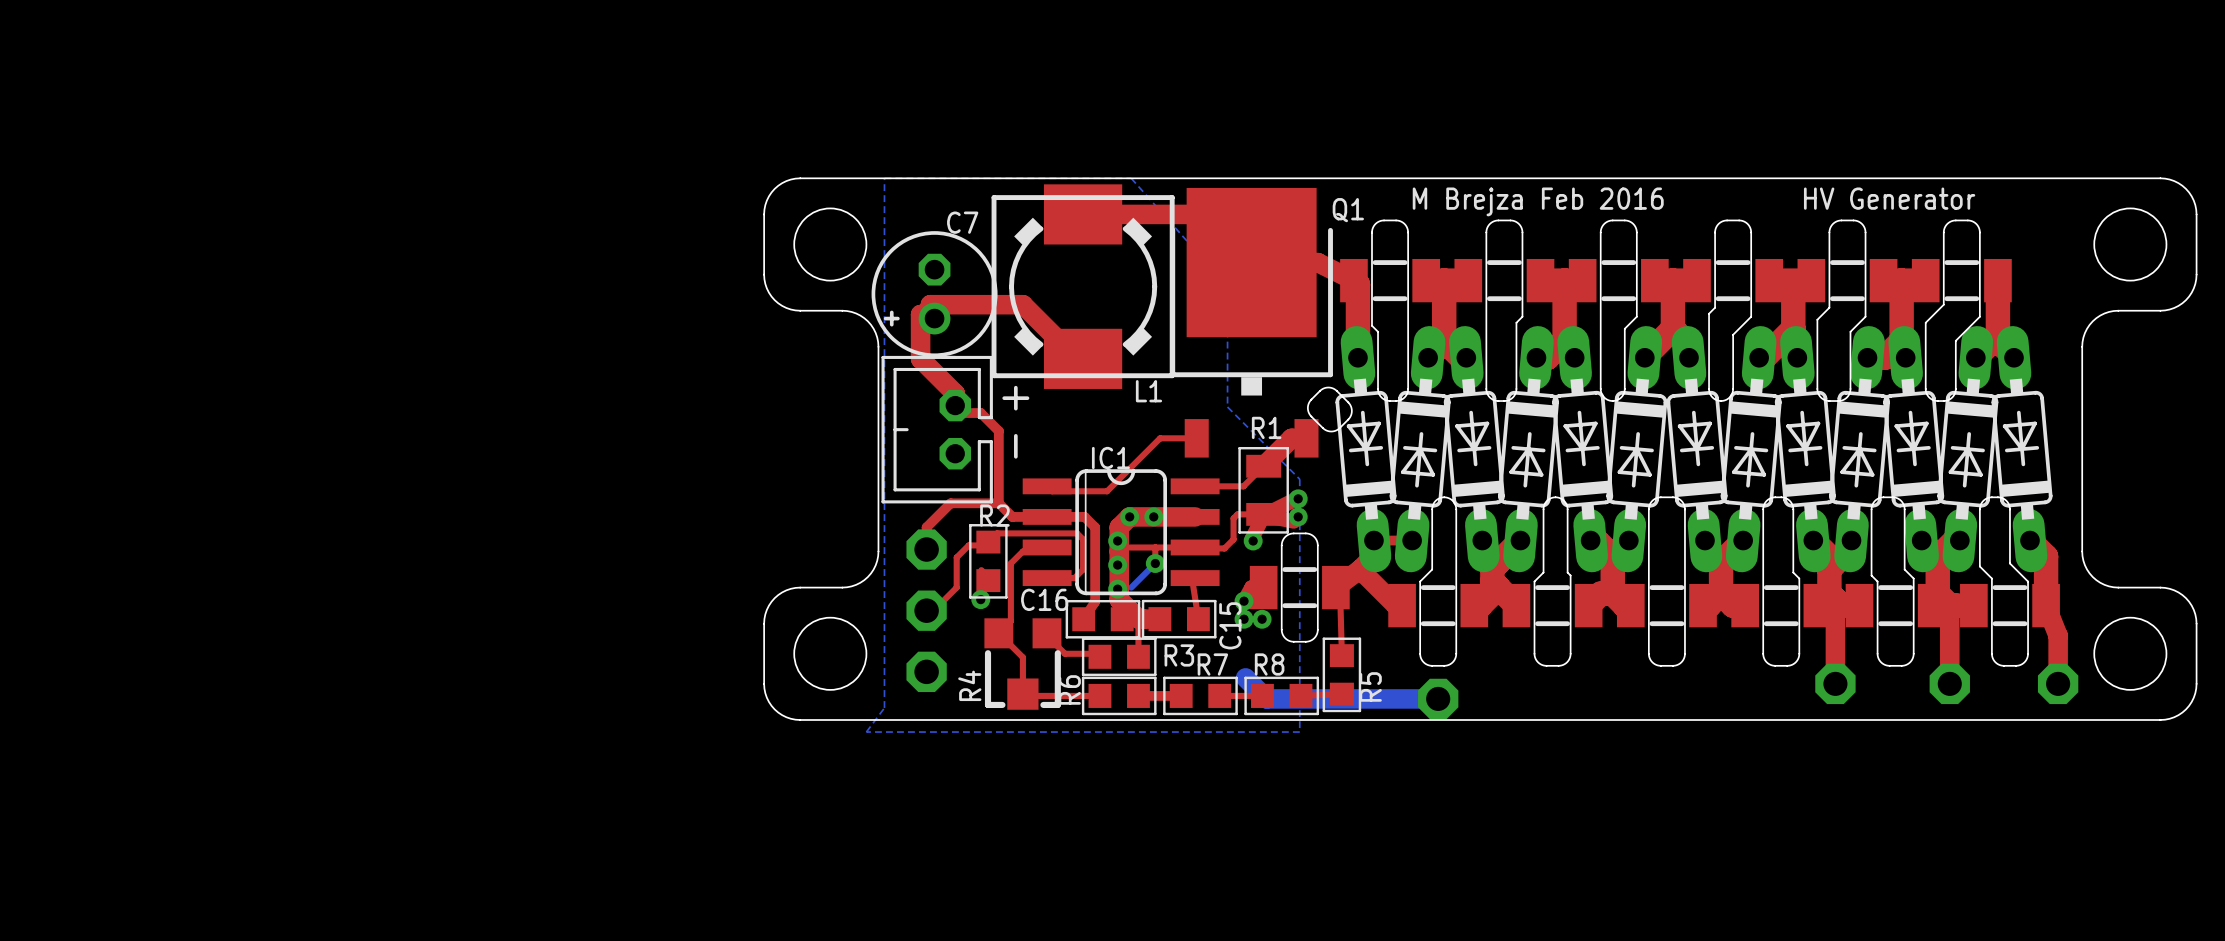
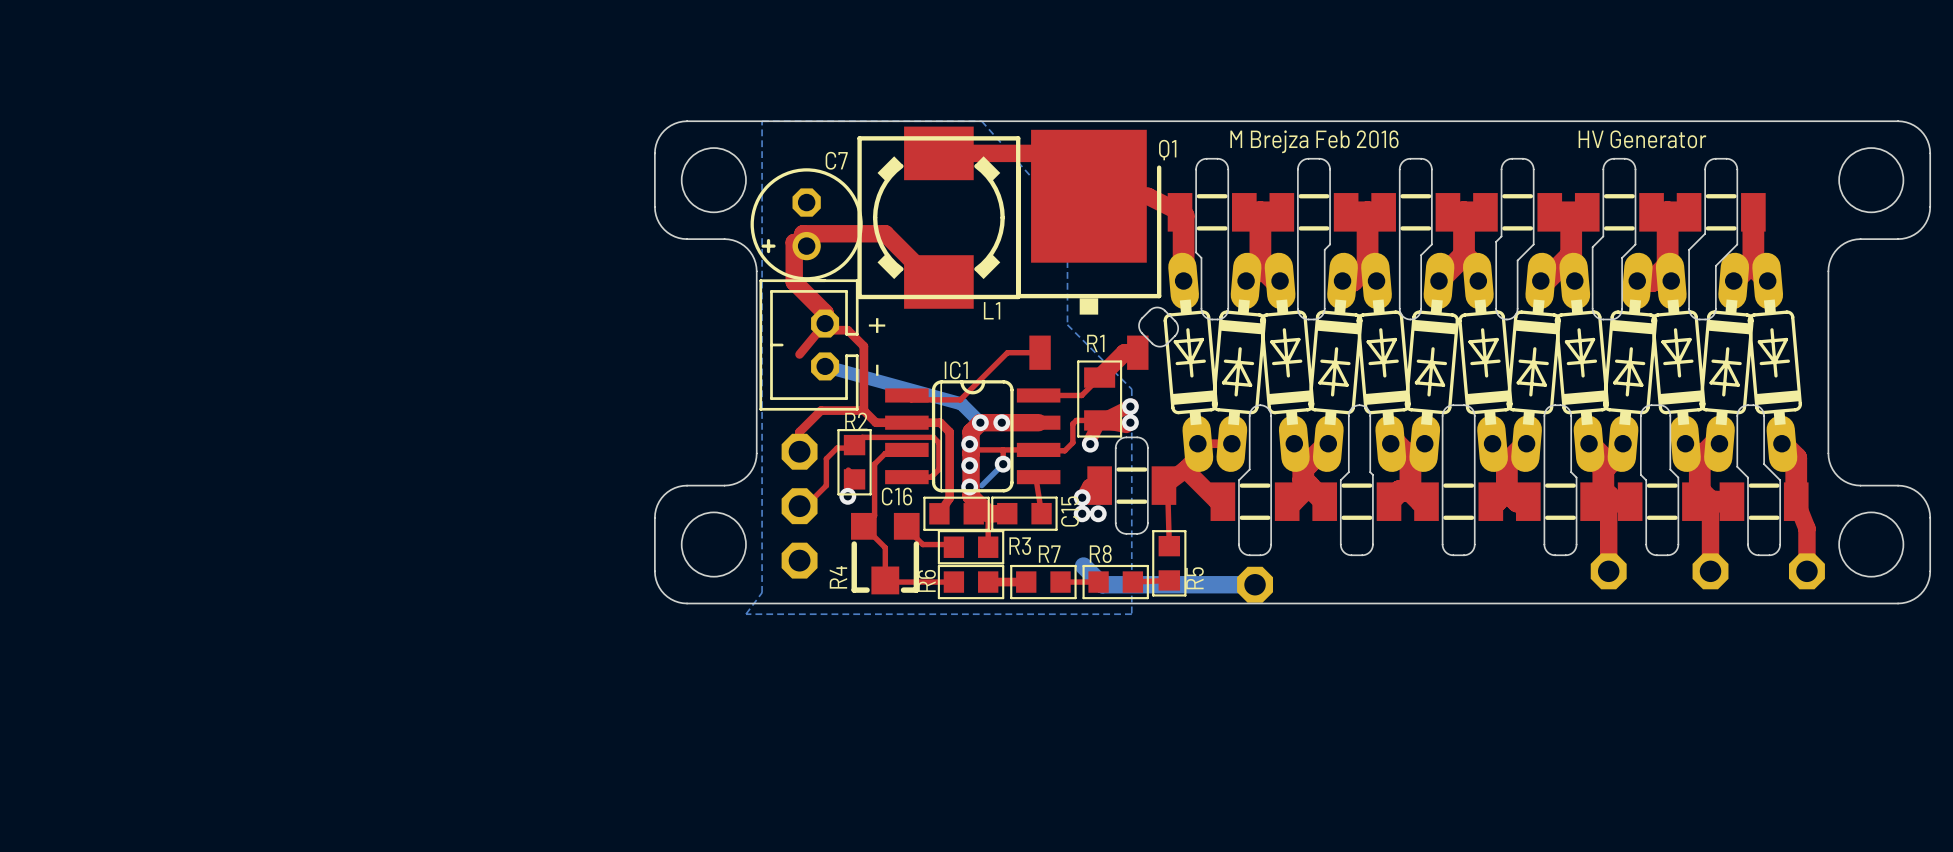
top track: none -> (825, 323) (799, 354)
bottom track: none -> (825, 366) (961, 403) (980, 422)

